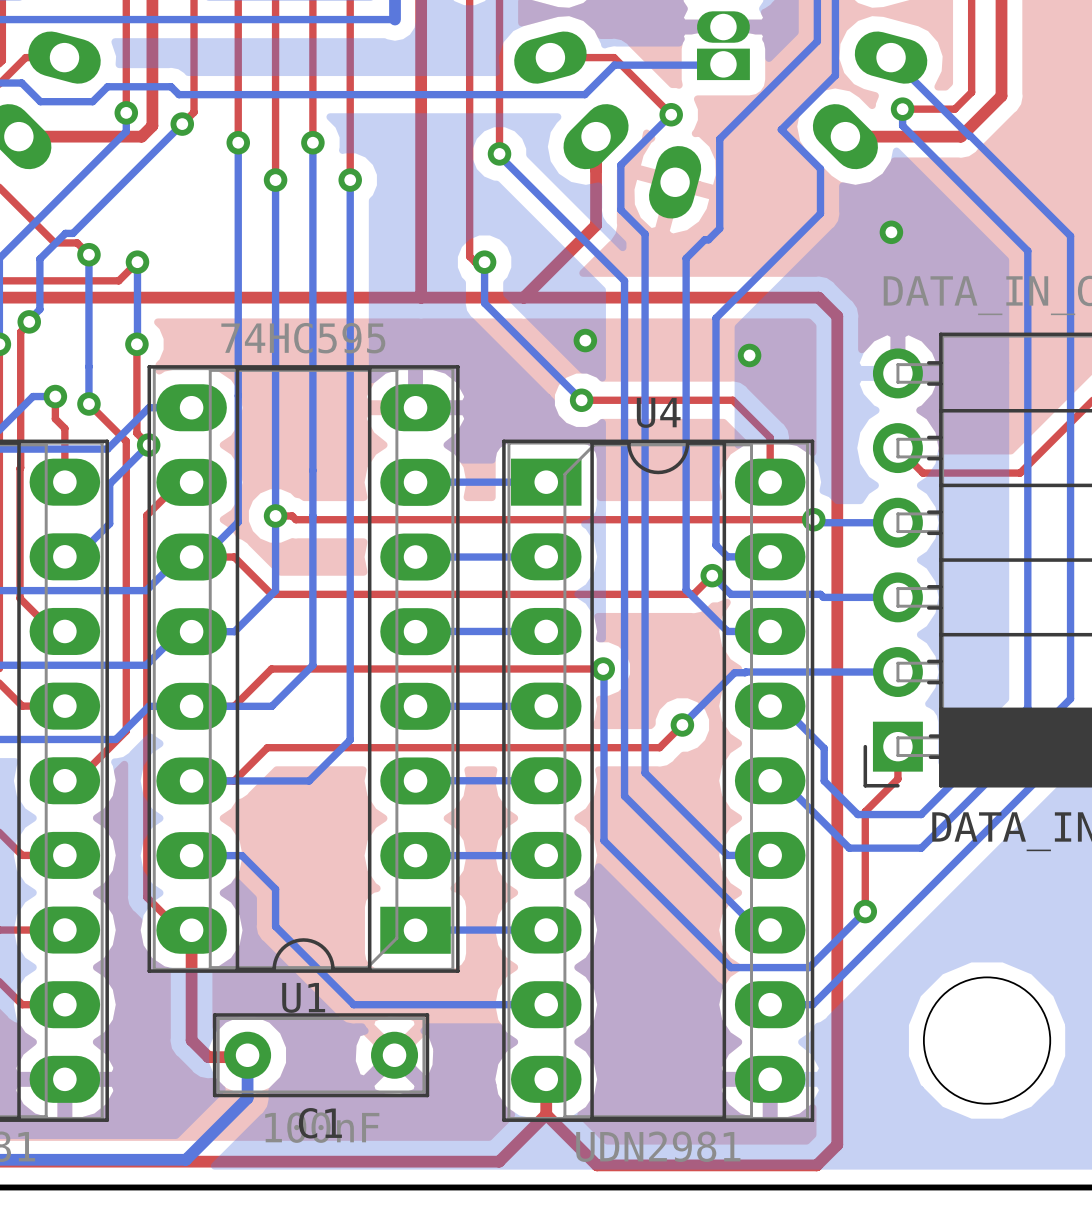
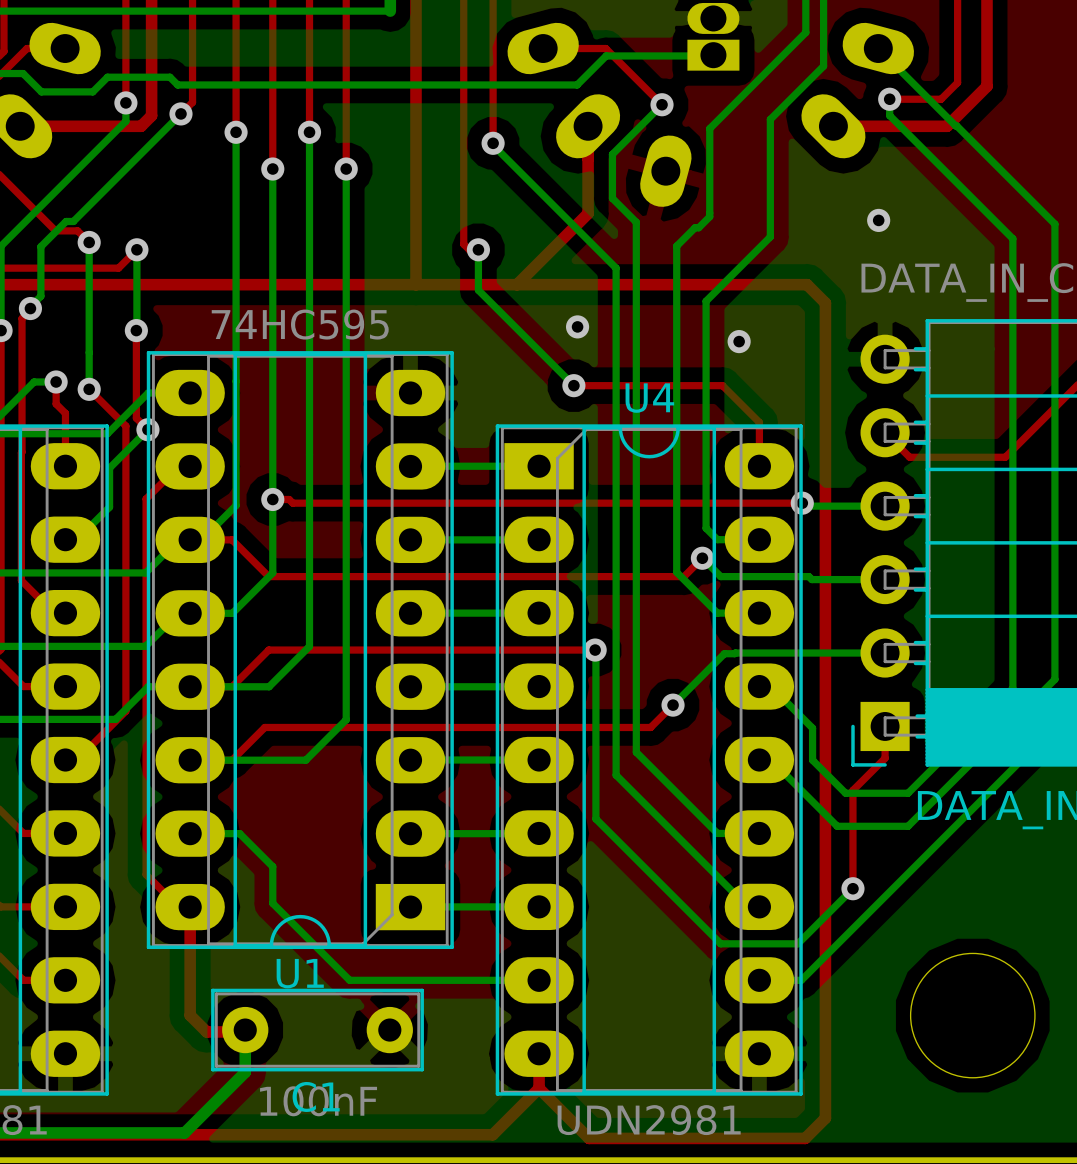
bottom track: (781, 129) (820, 168) (820, 213) (715, 318) -> (770, 119) (770, 236) (706, 301) (706, 304)

